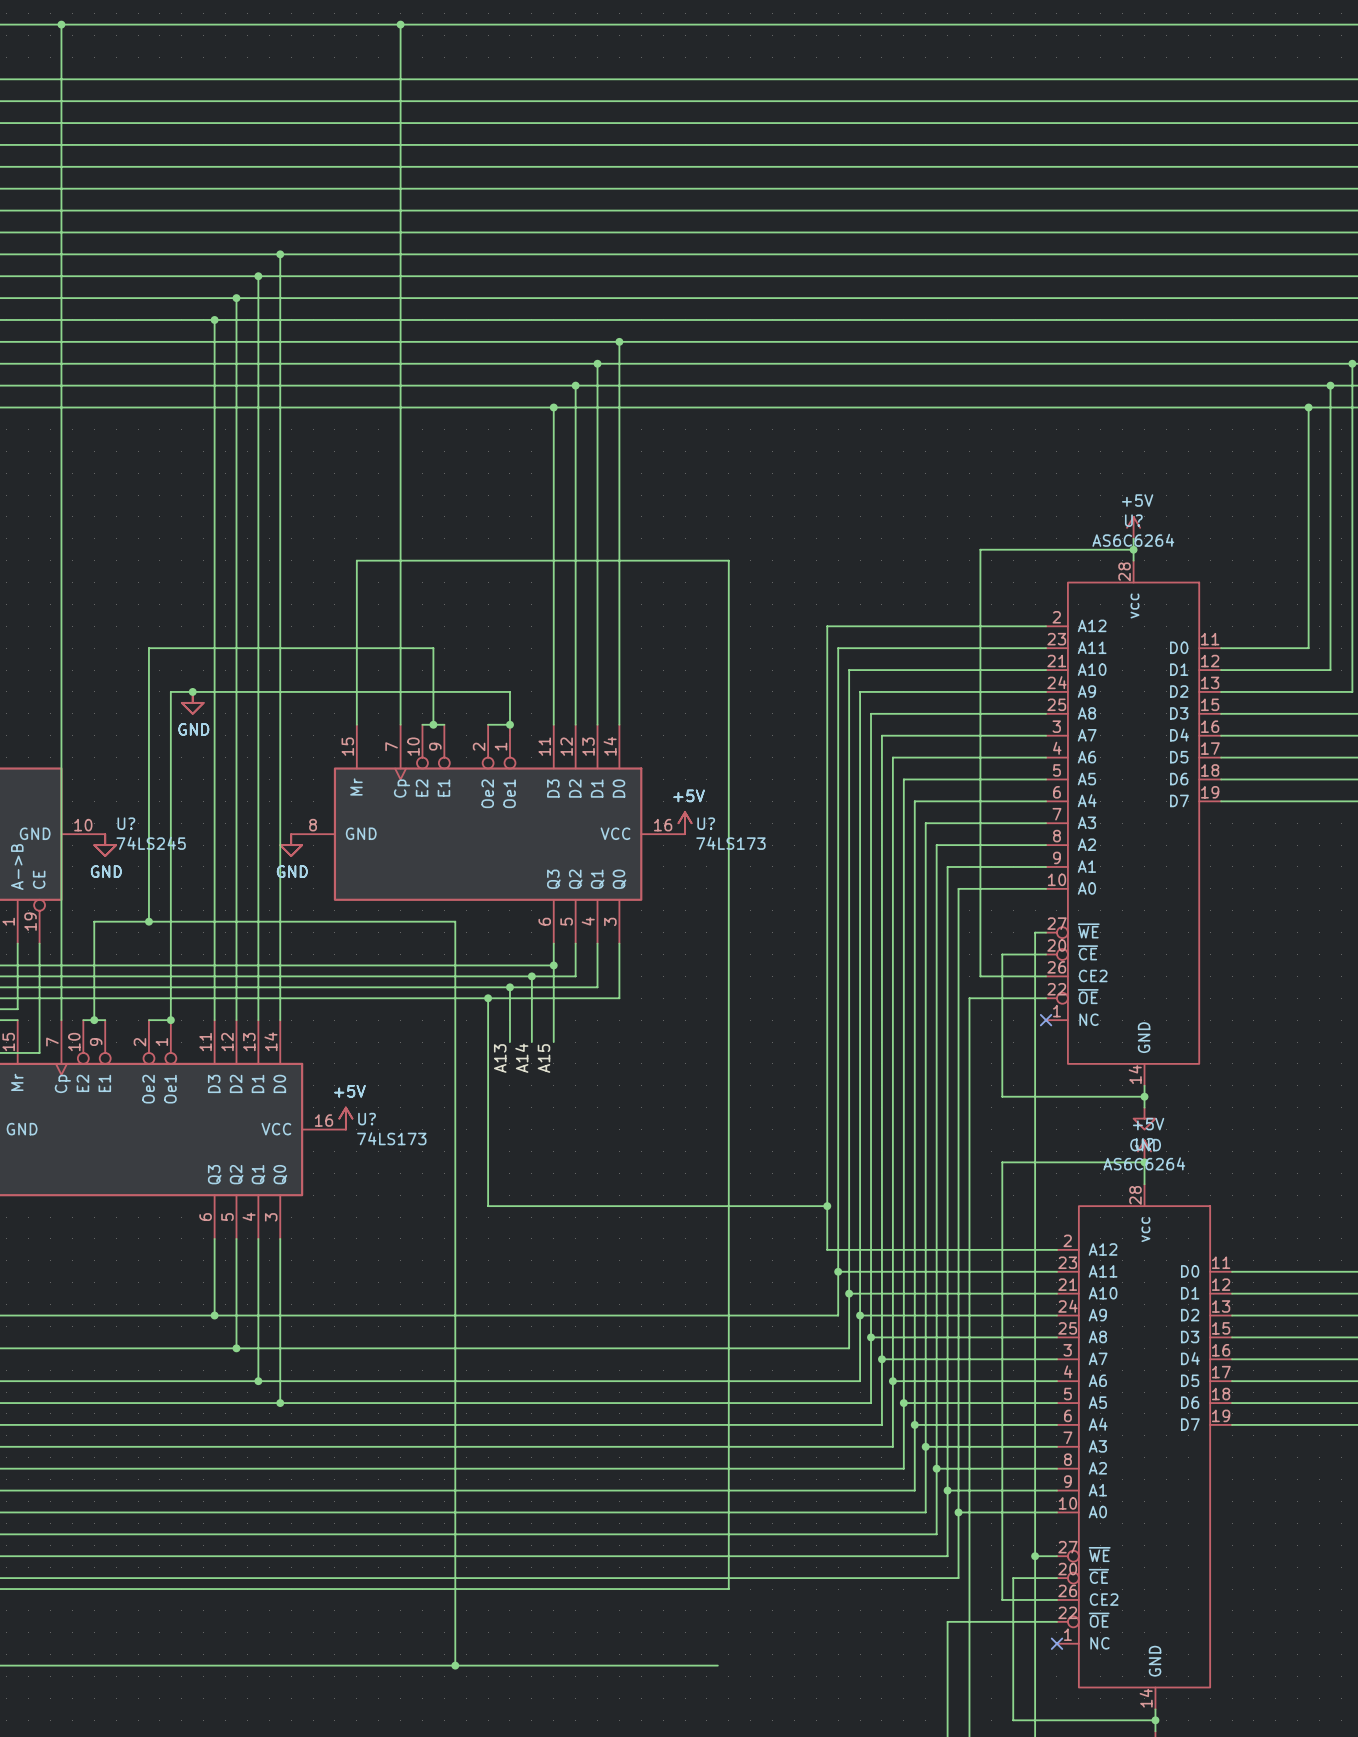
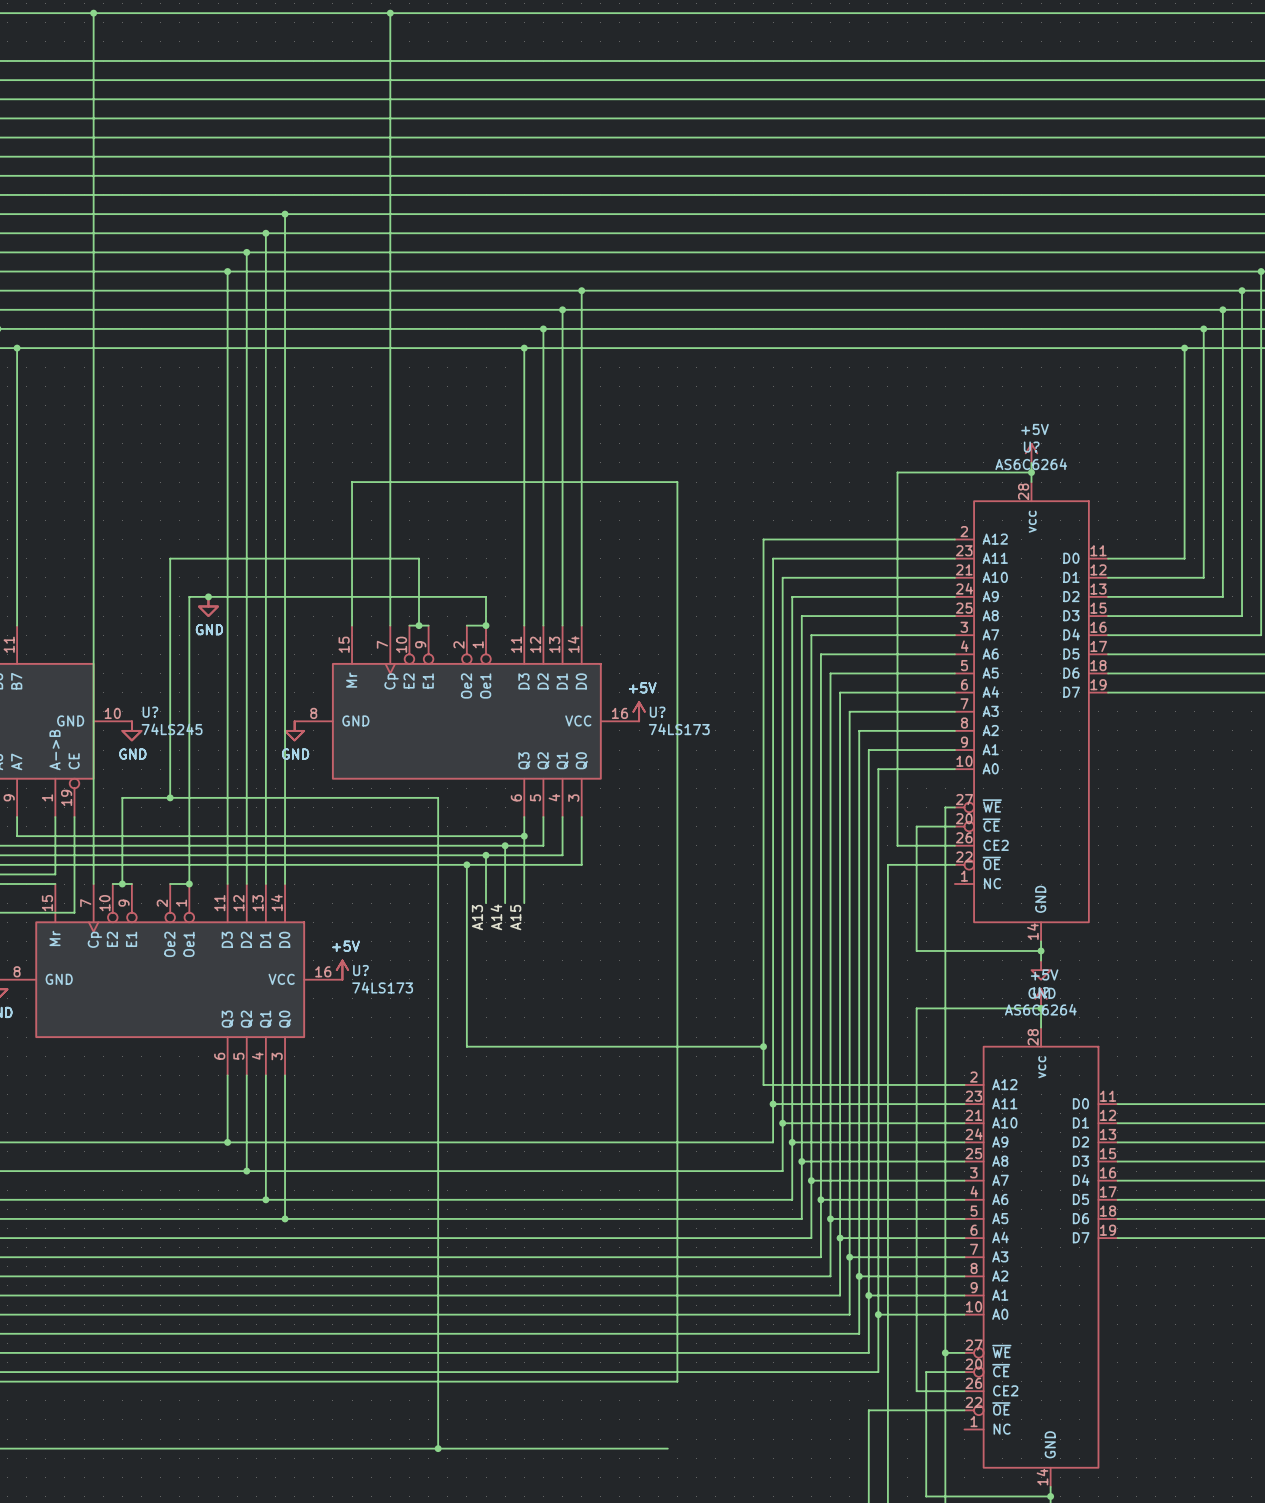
no-connect mark: (1046, 1020) -> none
no-connect mark: (1056, 1643) -> none

